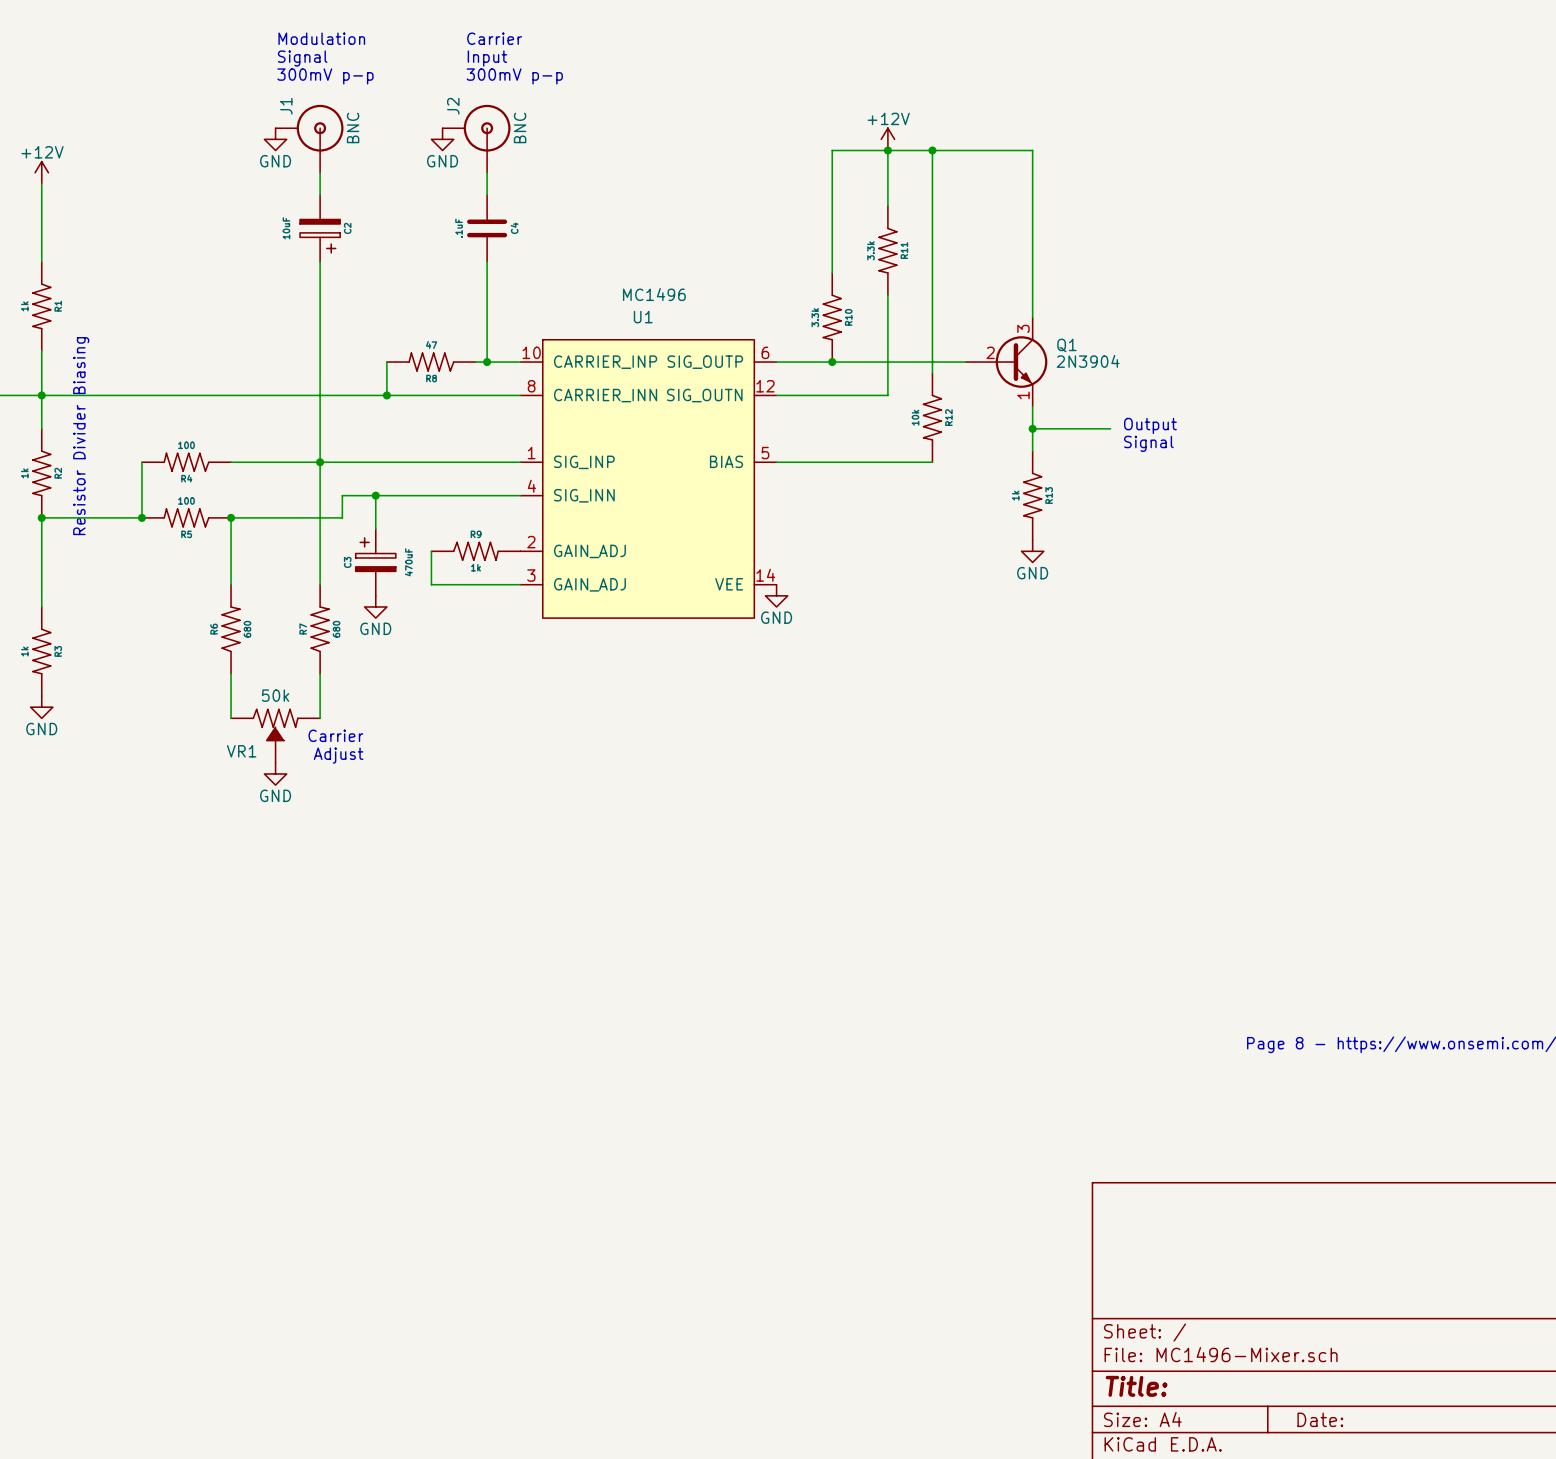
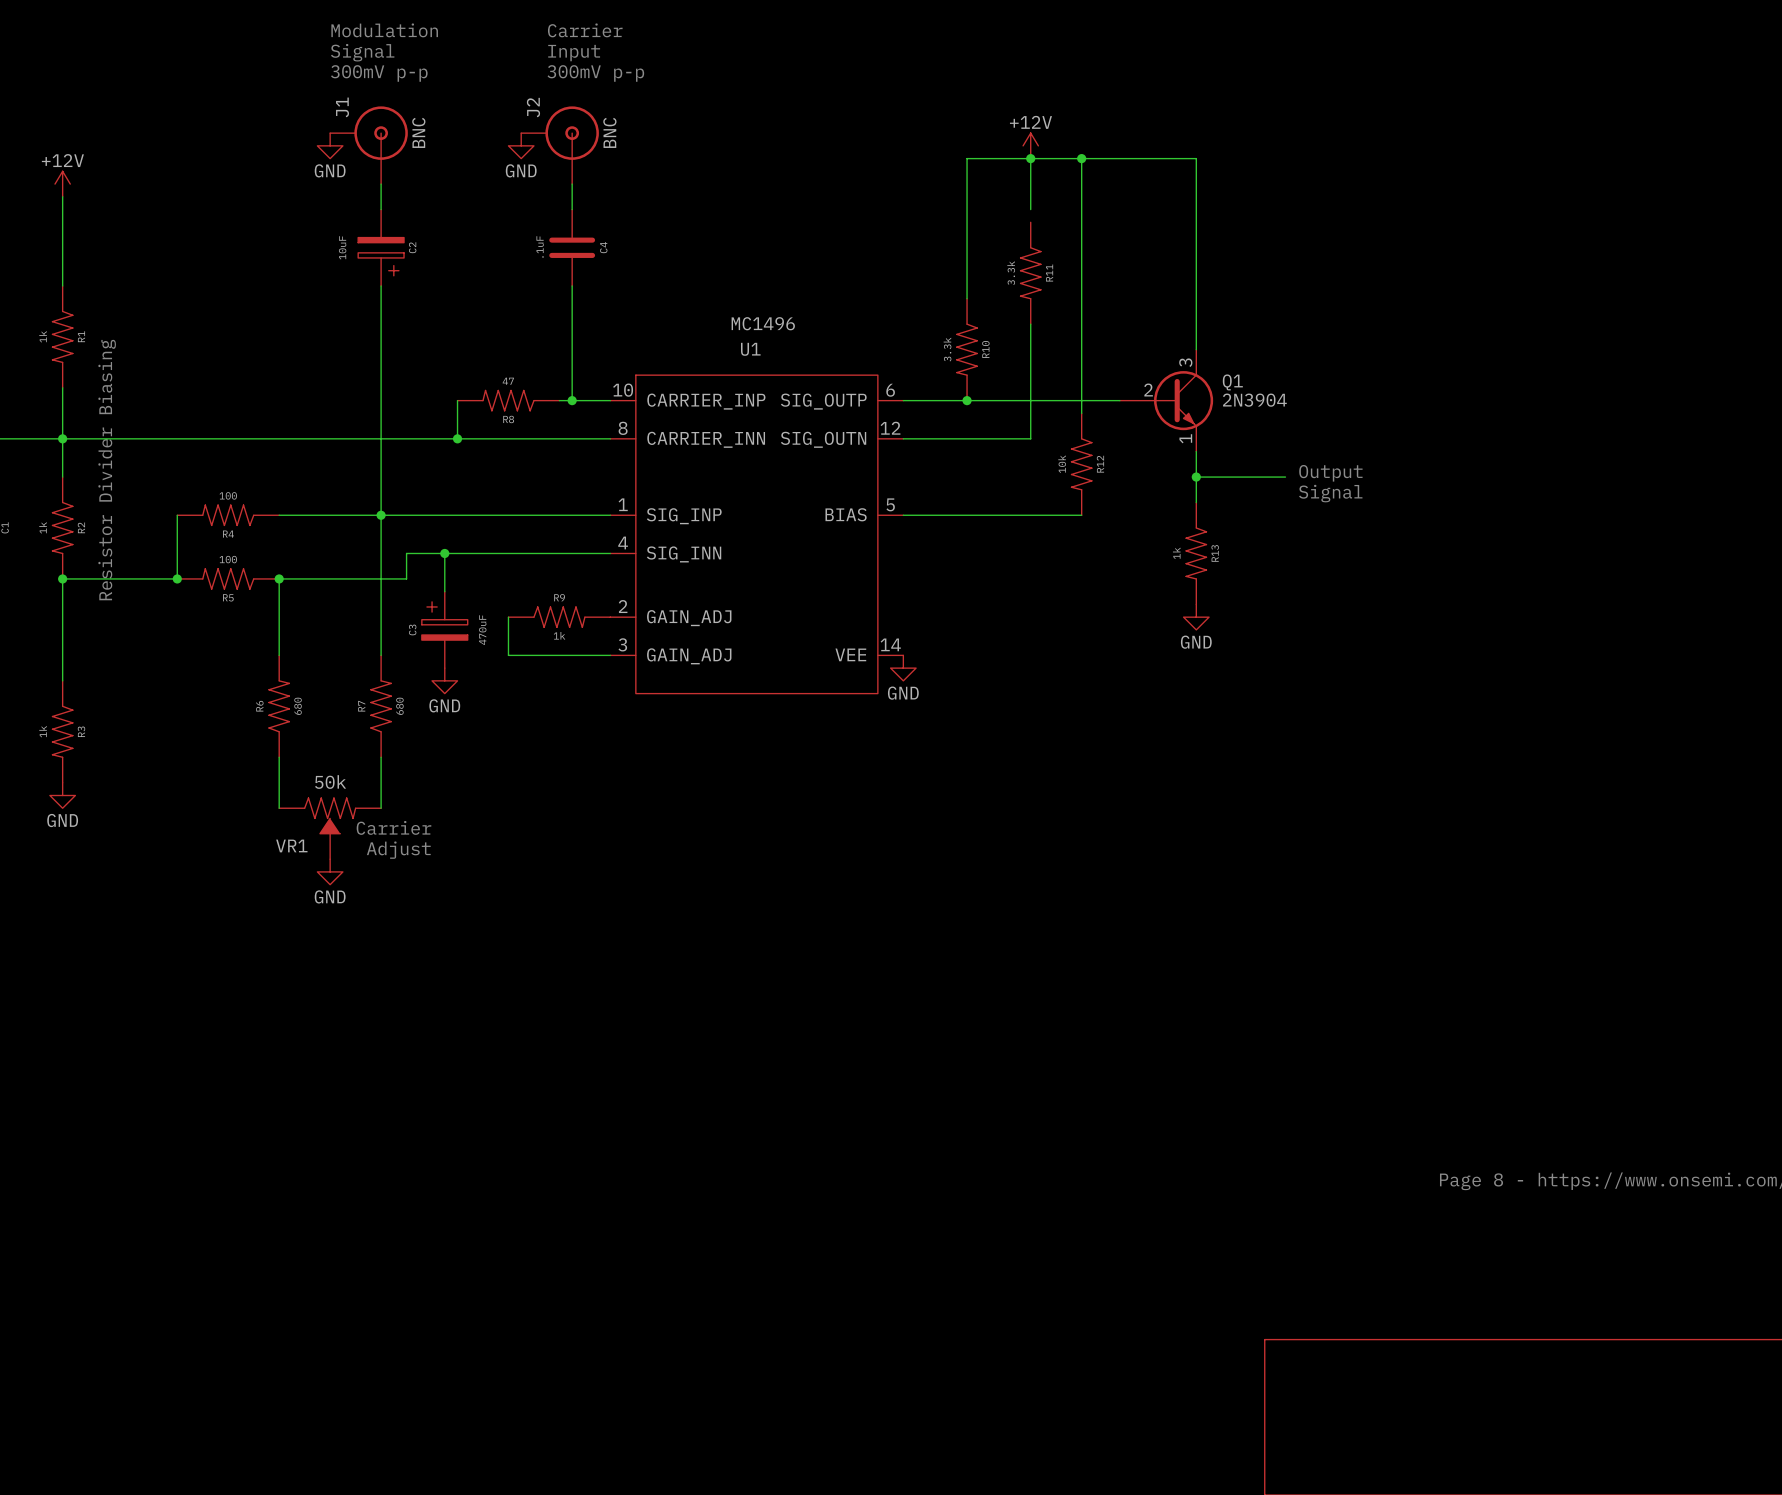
wire: (887, 195) (887, 206) -> none

